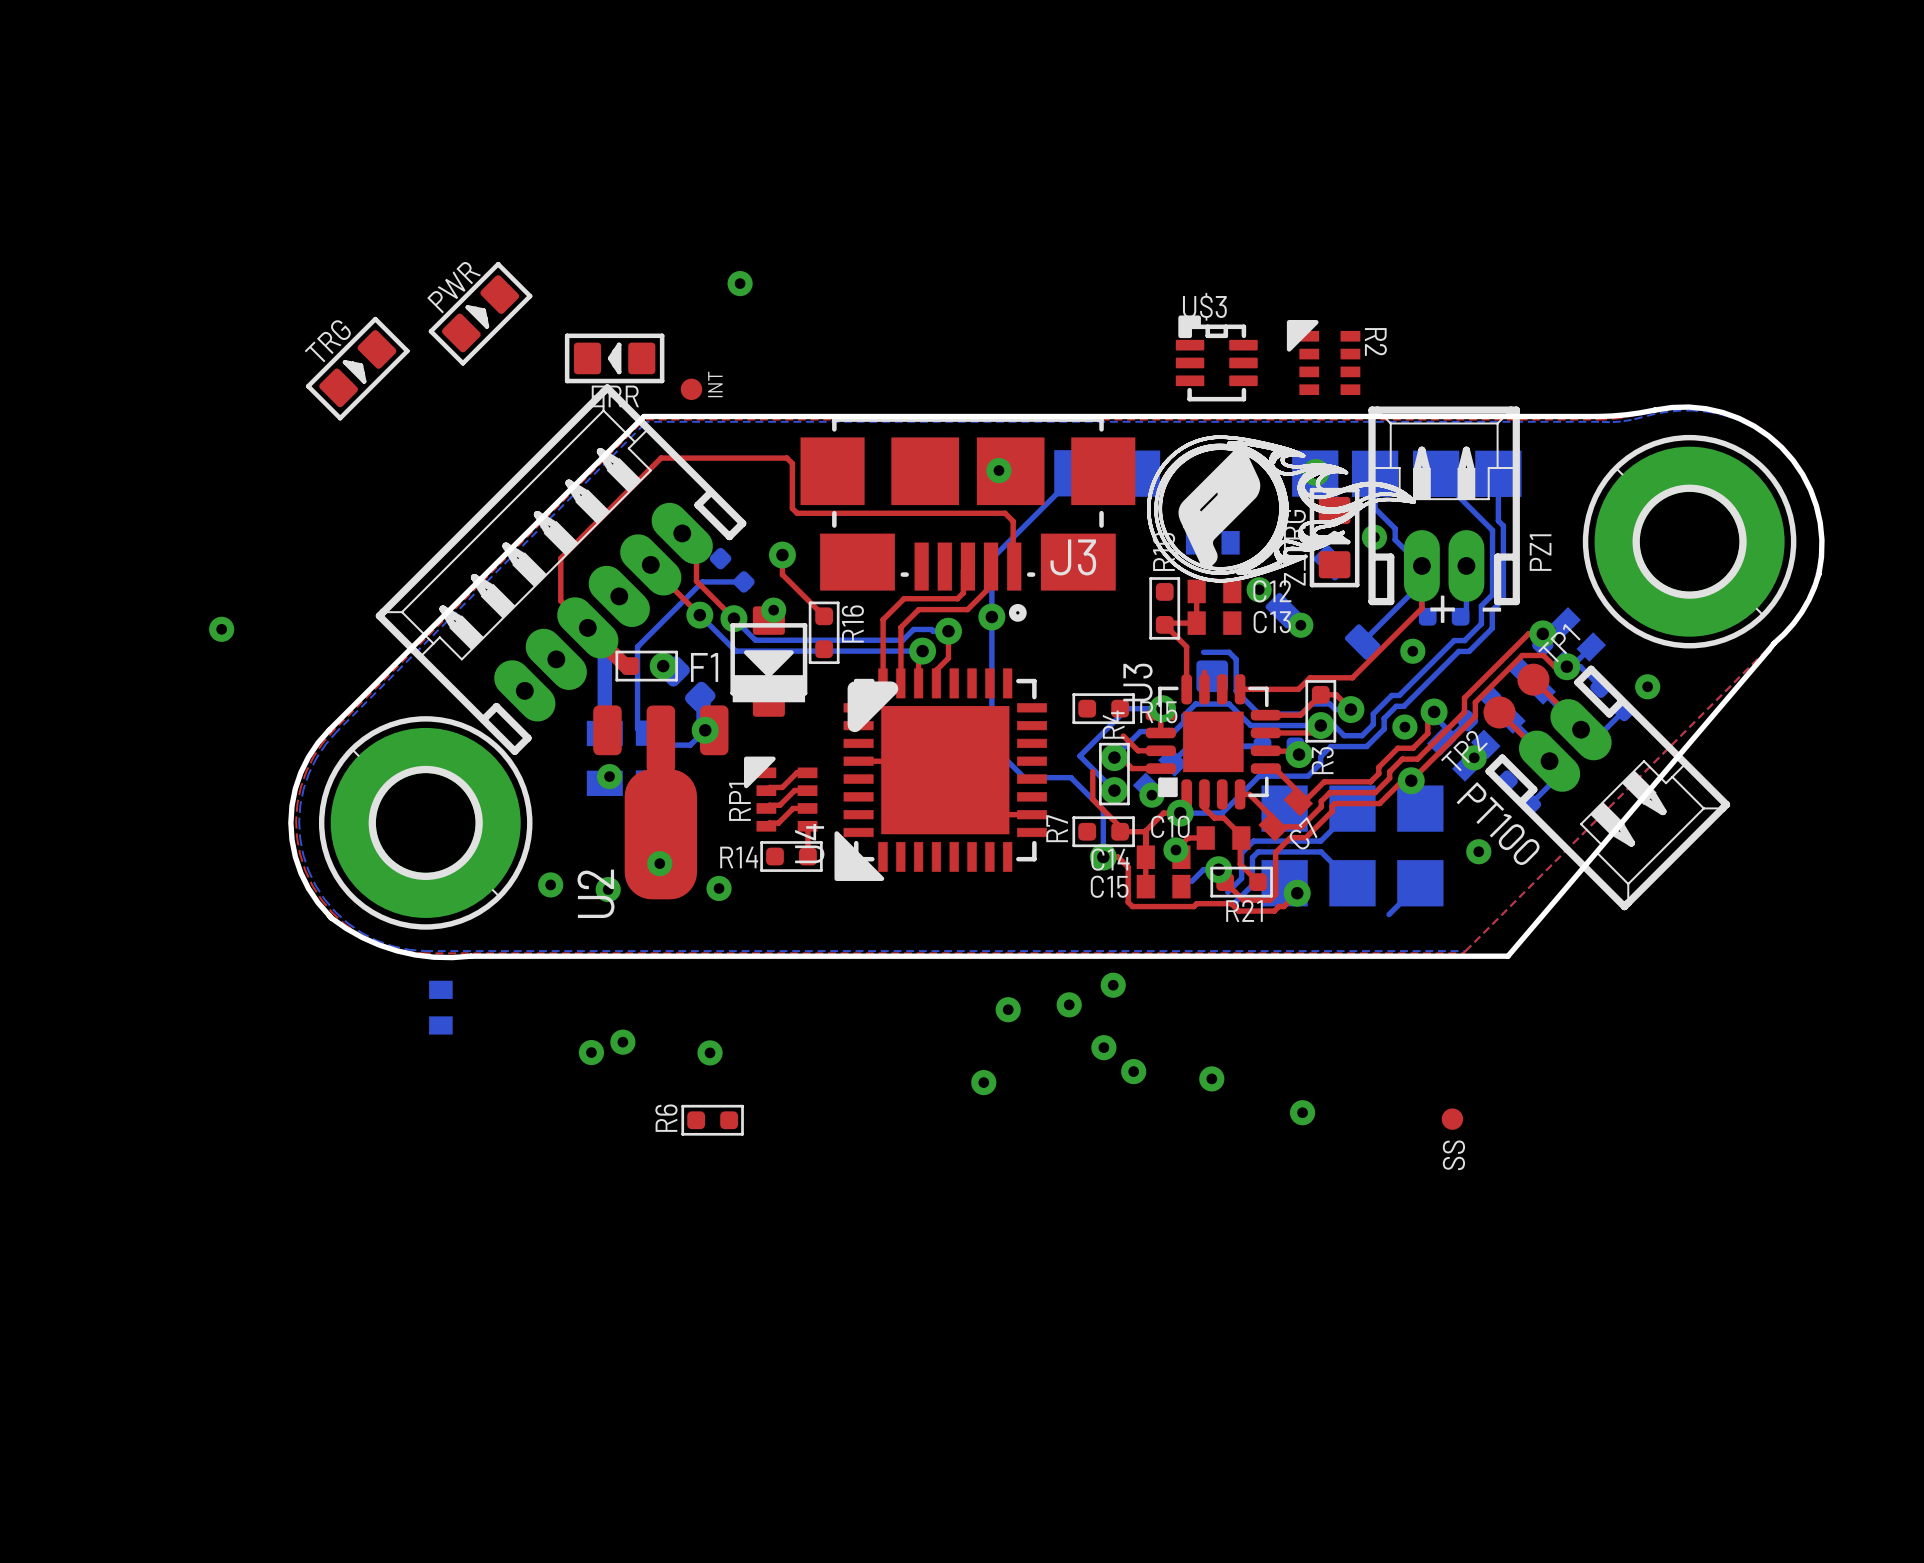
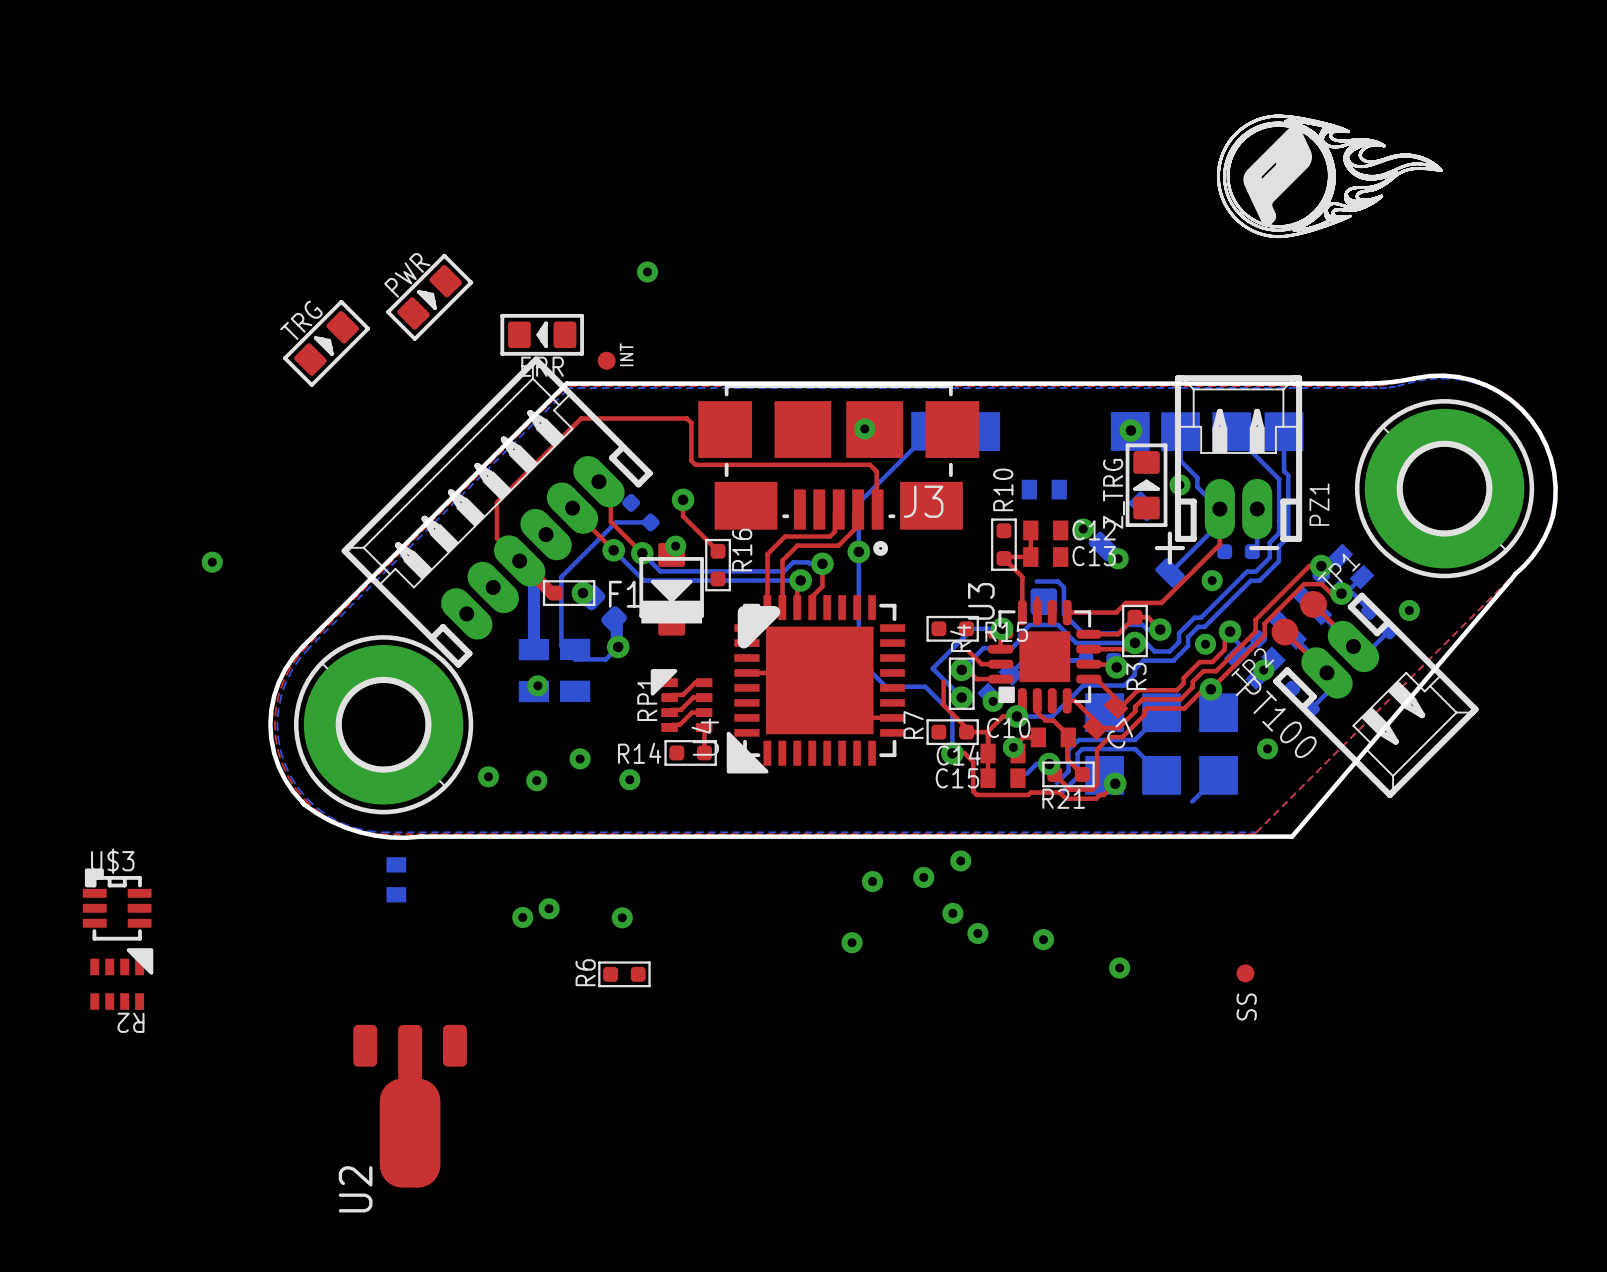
R2 rotation: 0° (1323, 357) -> 90° clockwise (121, 979)
R2 position: (1323, 357) -> (121, 979)
U$3 position: (1216, 358) -> (117, 904)
drawing position: (1281, 508) -> (1329, 176)
U2 position: (660, 802) -> (410, 1106)

